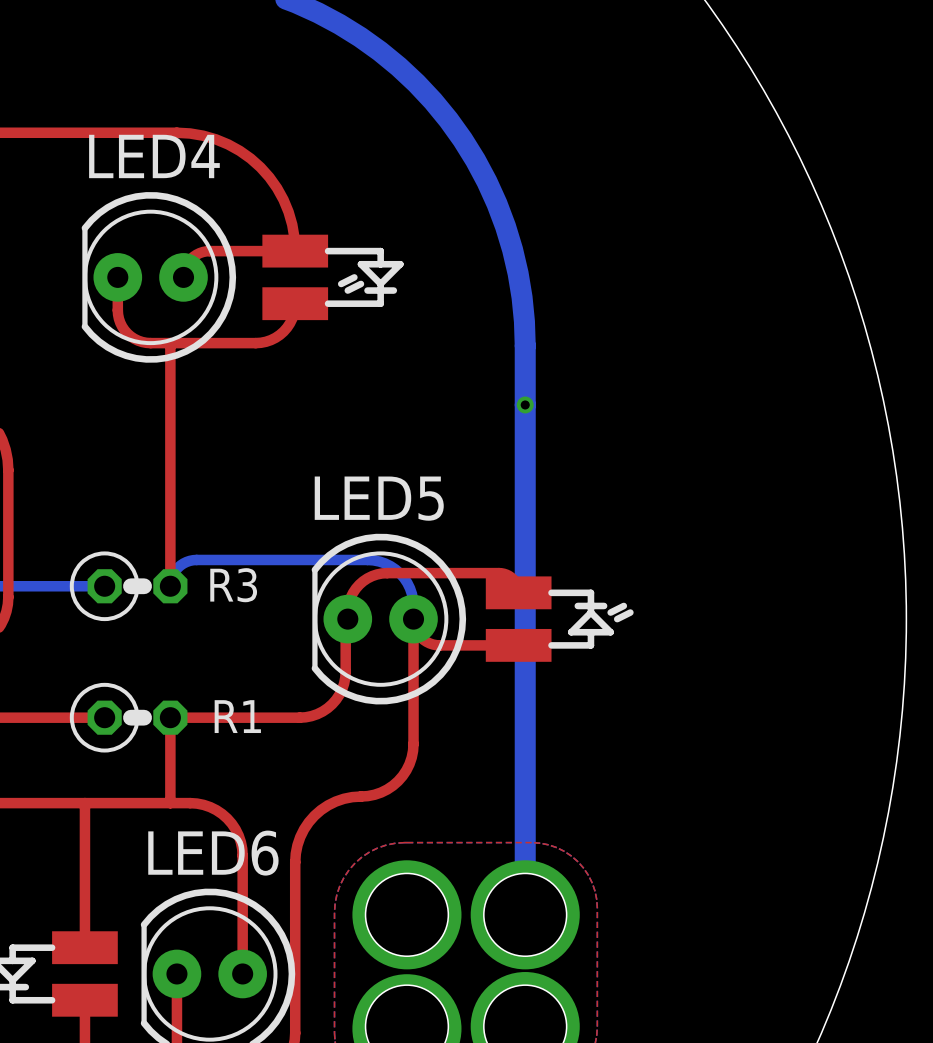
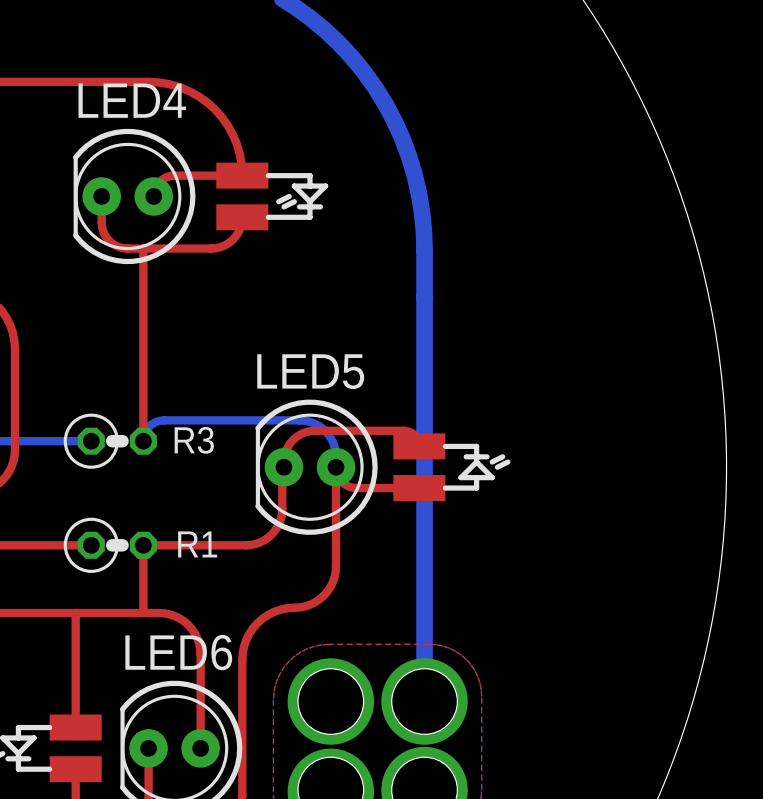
via: (525, 404) -> none

